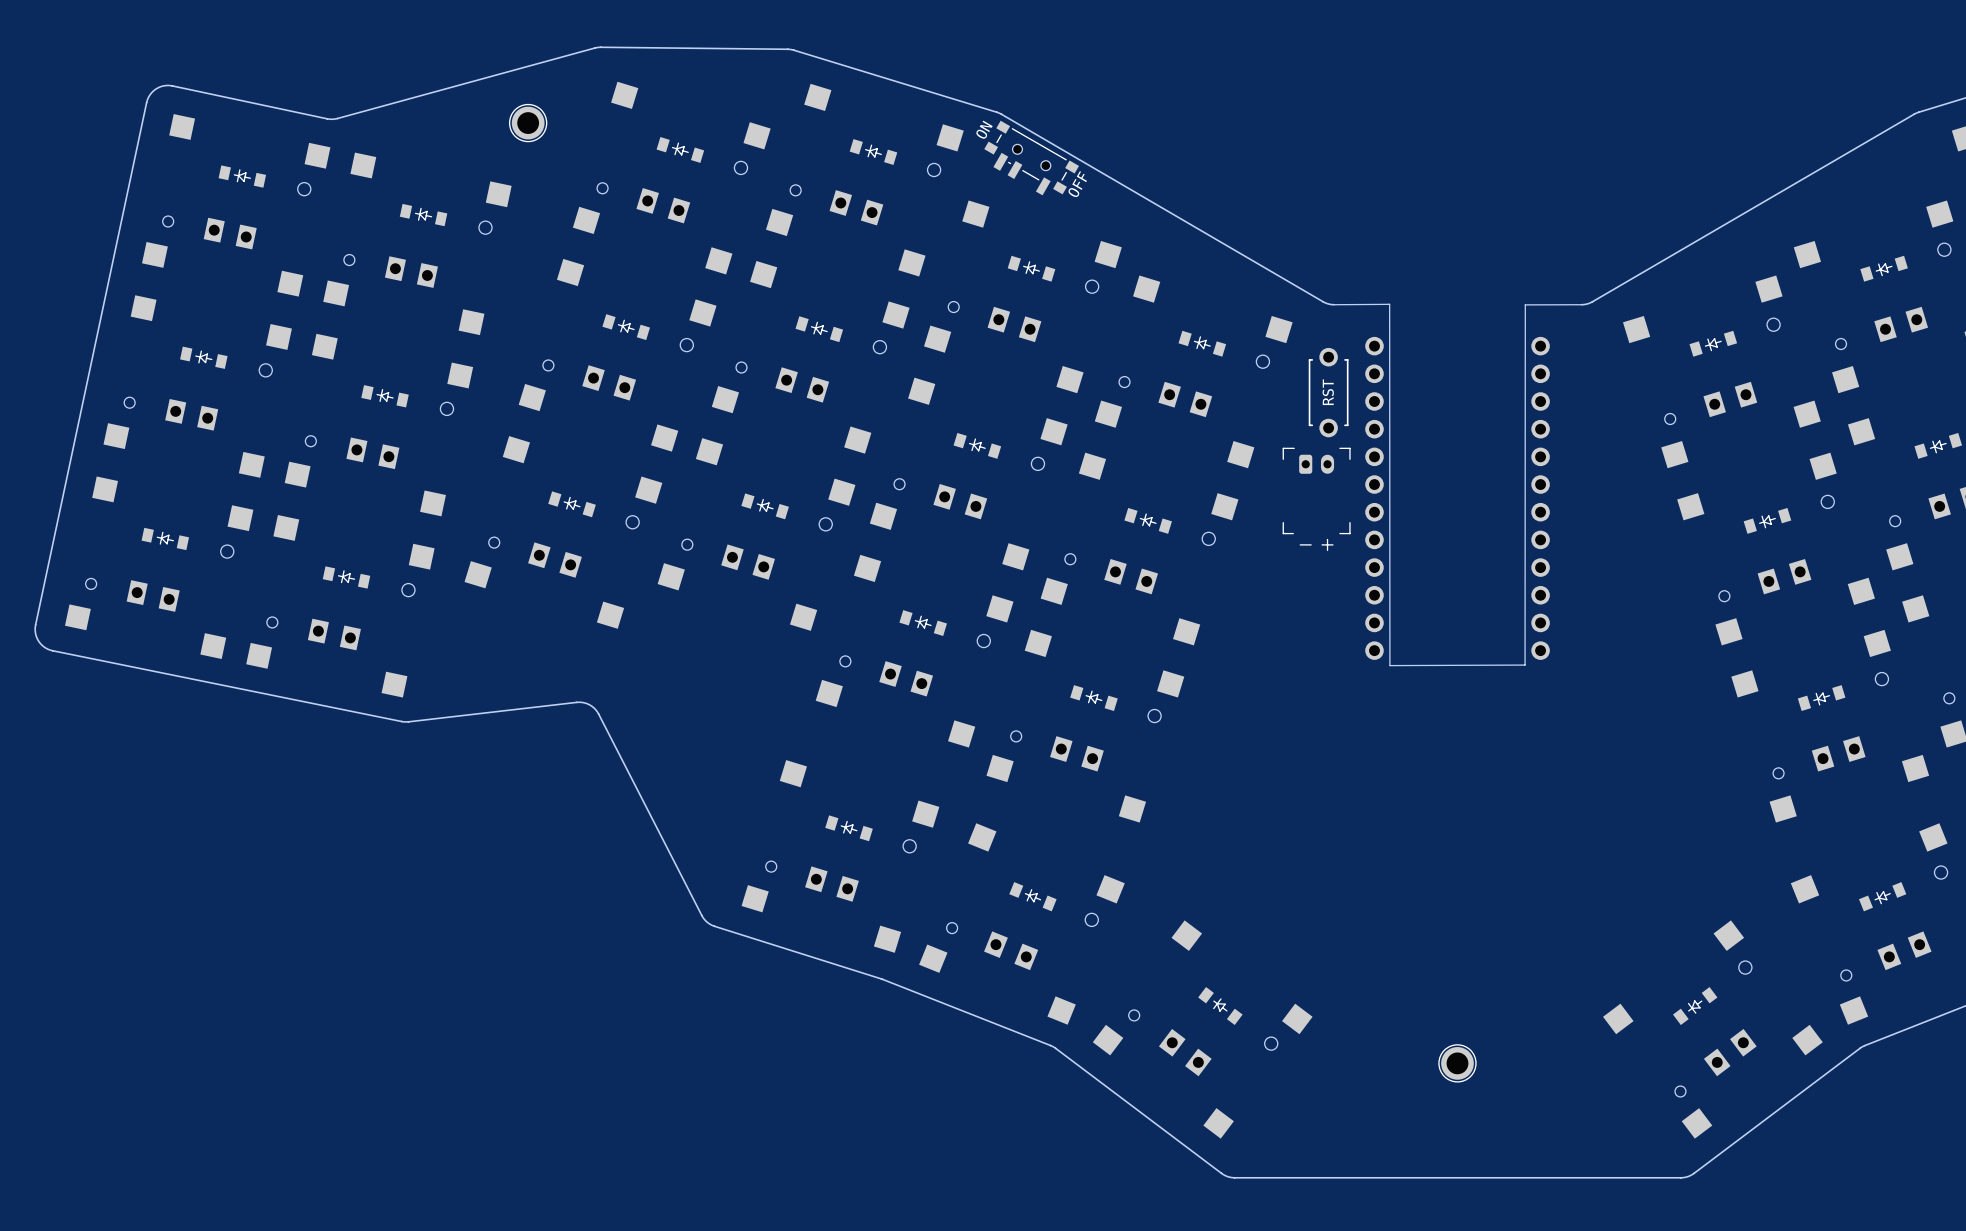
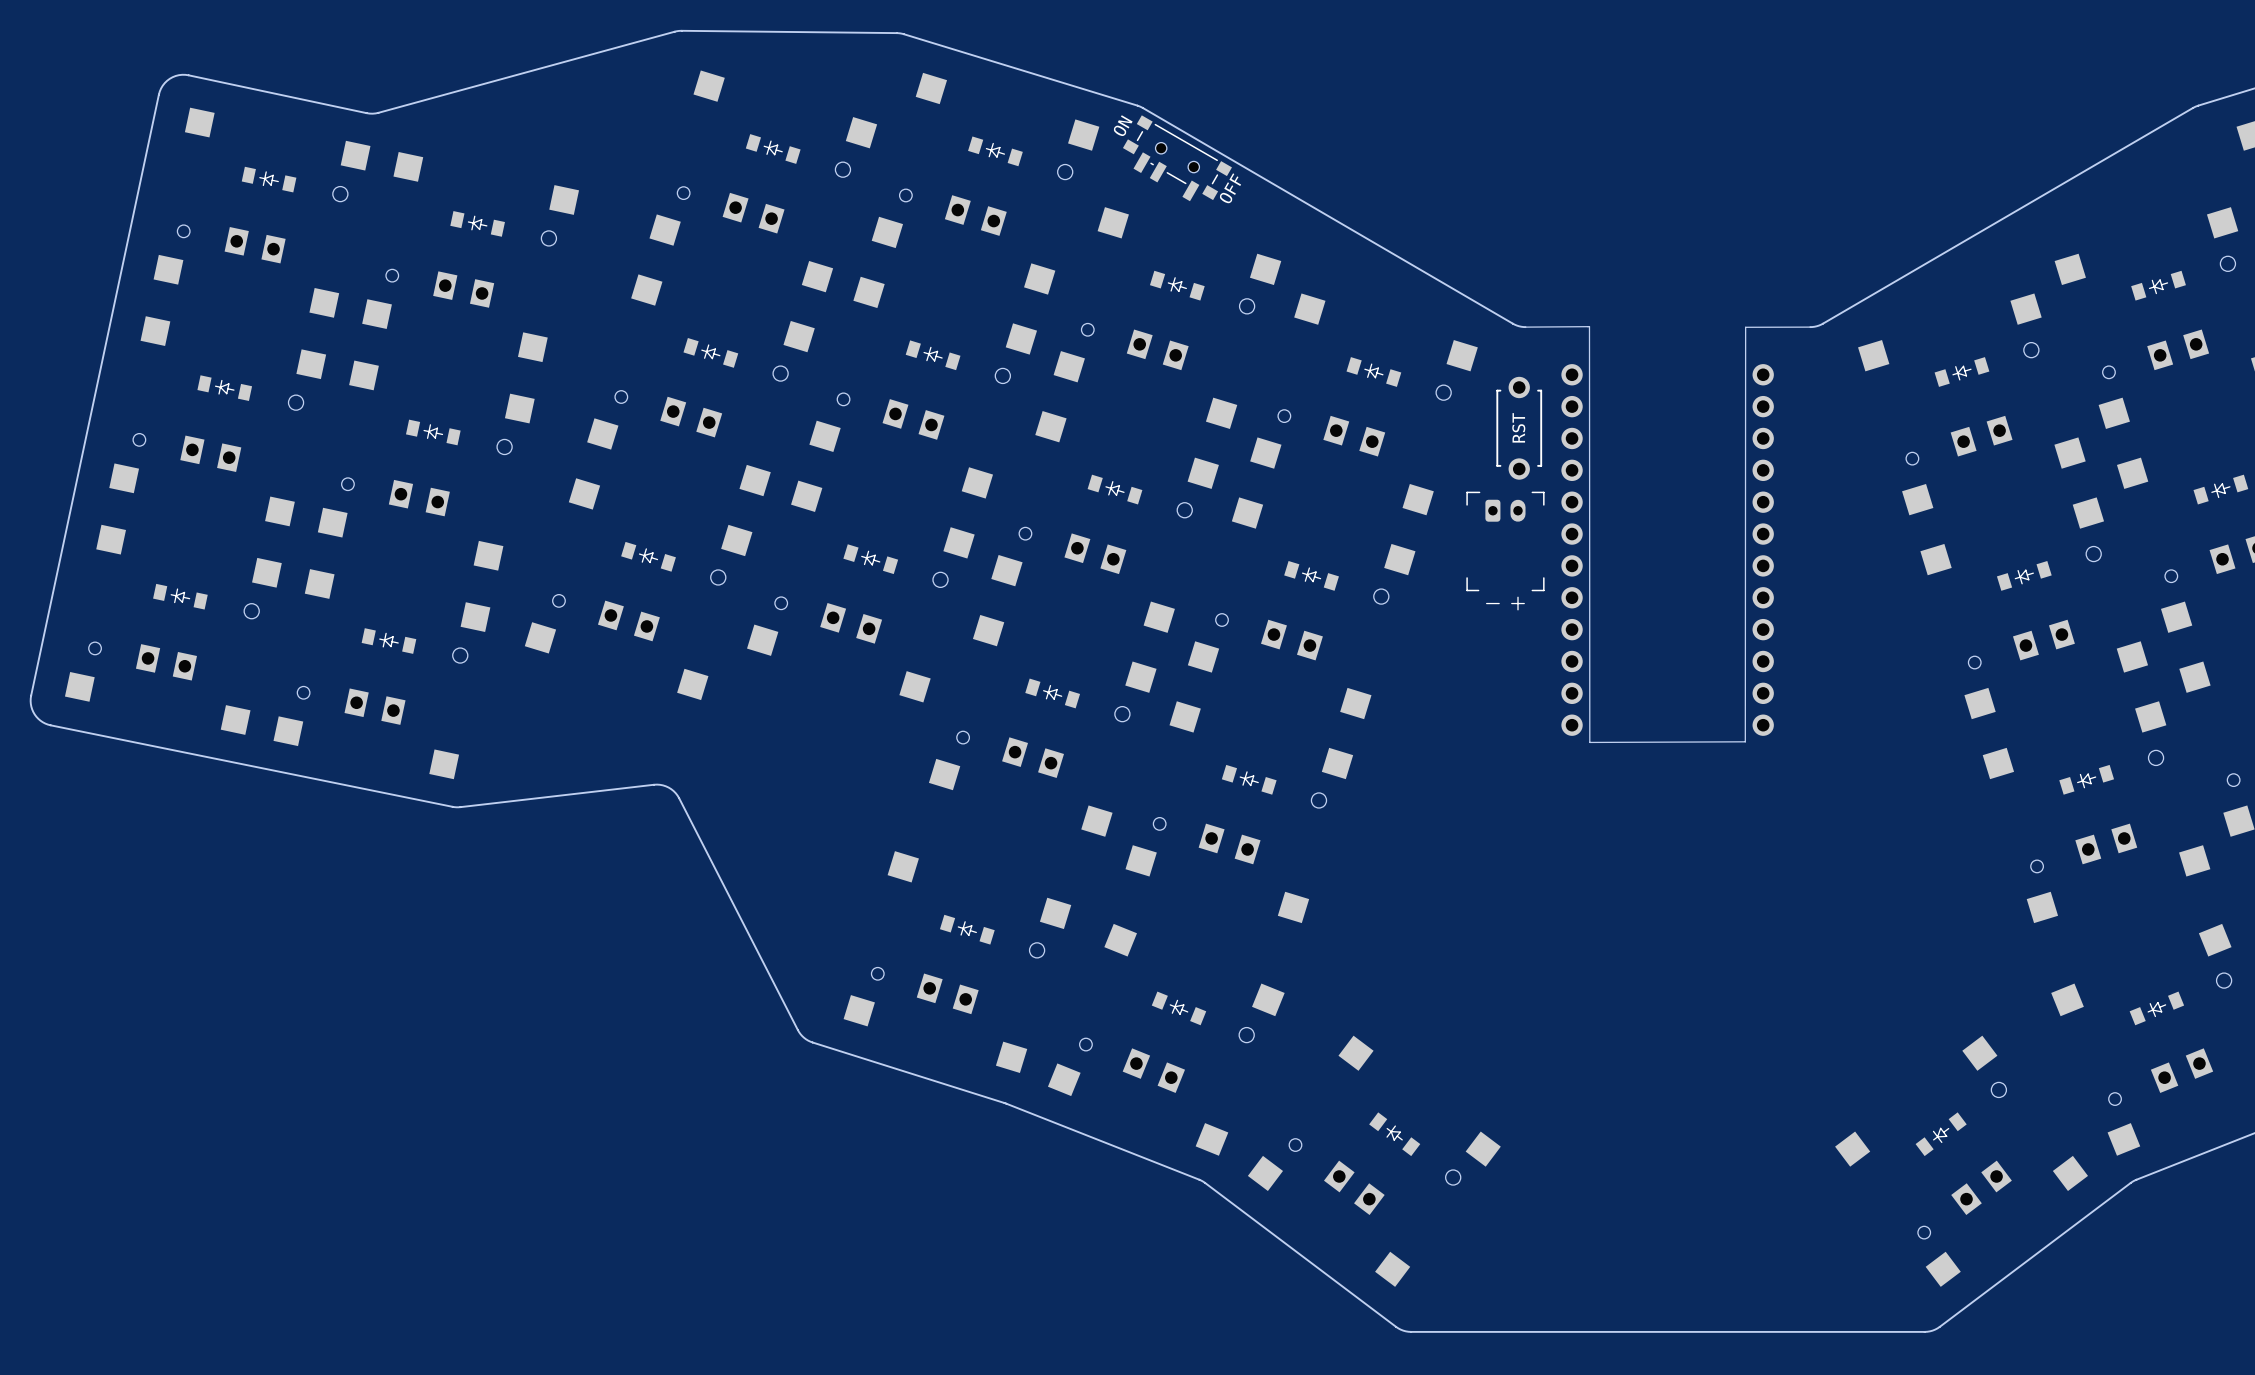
part: (528, 123) -> none
part: (1457, 1063) -> none

